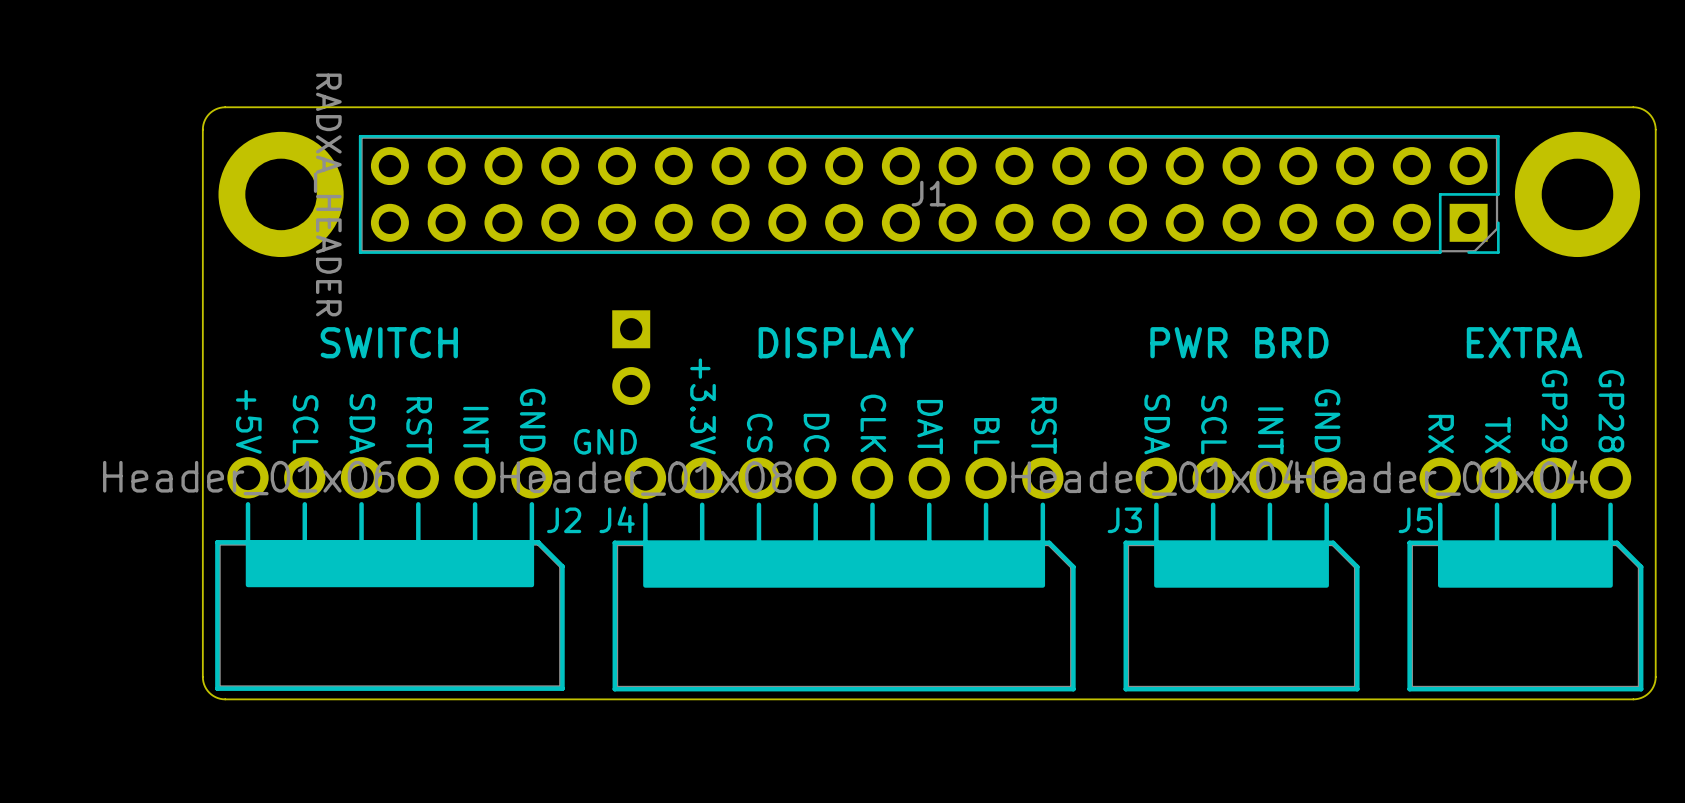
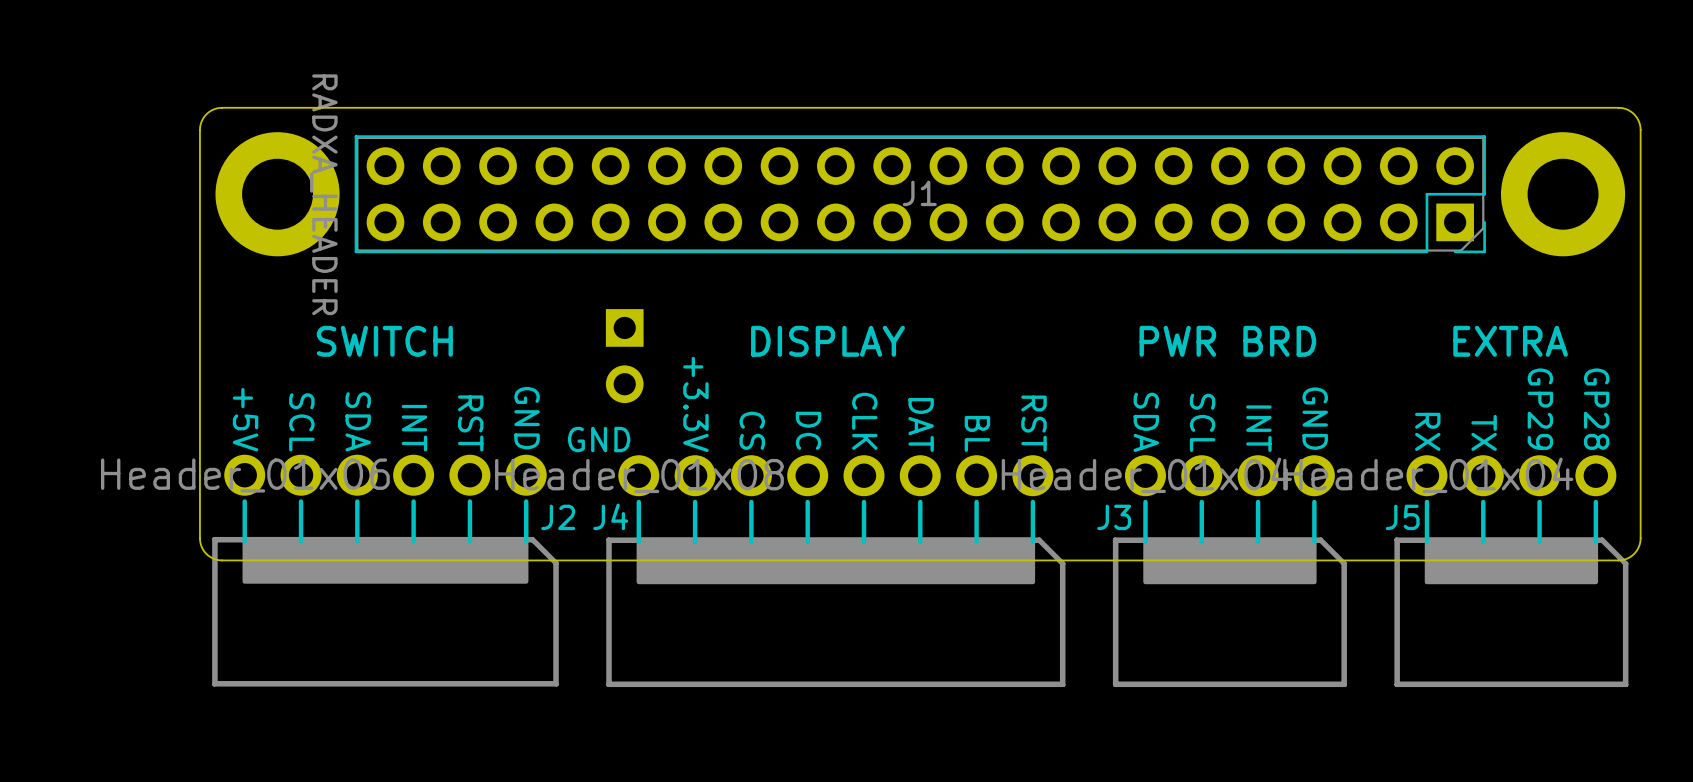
J2 footprint: [215, 457, 565, 691] -> [212, 454, 559, 687]
J4 footprint: [612, 457, 1076, 692] -> [606, 455, 1066, 688]
J3 footprint: [1123, 457, 1360, 692] -> [1112, 455, 1347, 688]
J5 footprint: [1407, 457, 1644, 692] -> [1394, 455, 1629, 688]
board edge: (1655, 541) (1655, 679) (1652, 688) (1647, 694) (1633, 699) (222, 699) (209, 692) (202, 679) (202, 541) -> (1640, 538) (1639, 545) (1634, 553) (1628, 558) (1618, 560) (222, 560) (214, 559) (206, 553) (201, 545) (199, 538)

